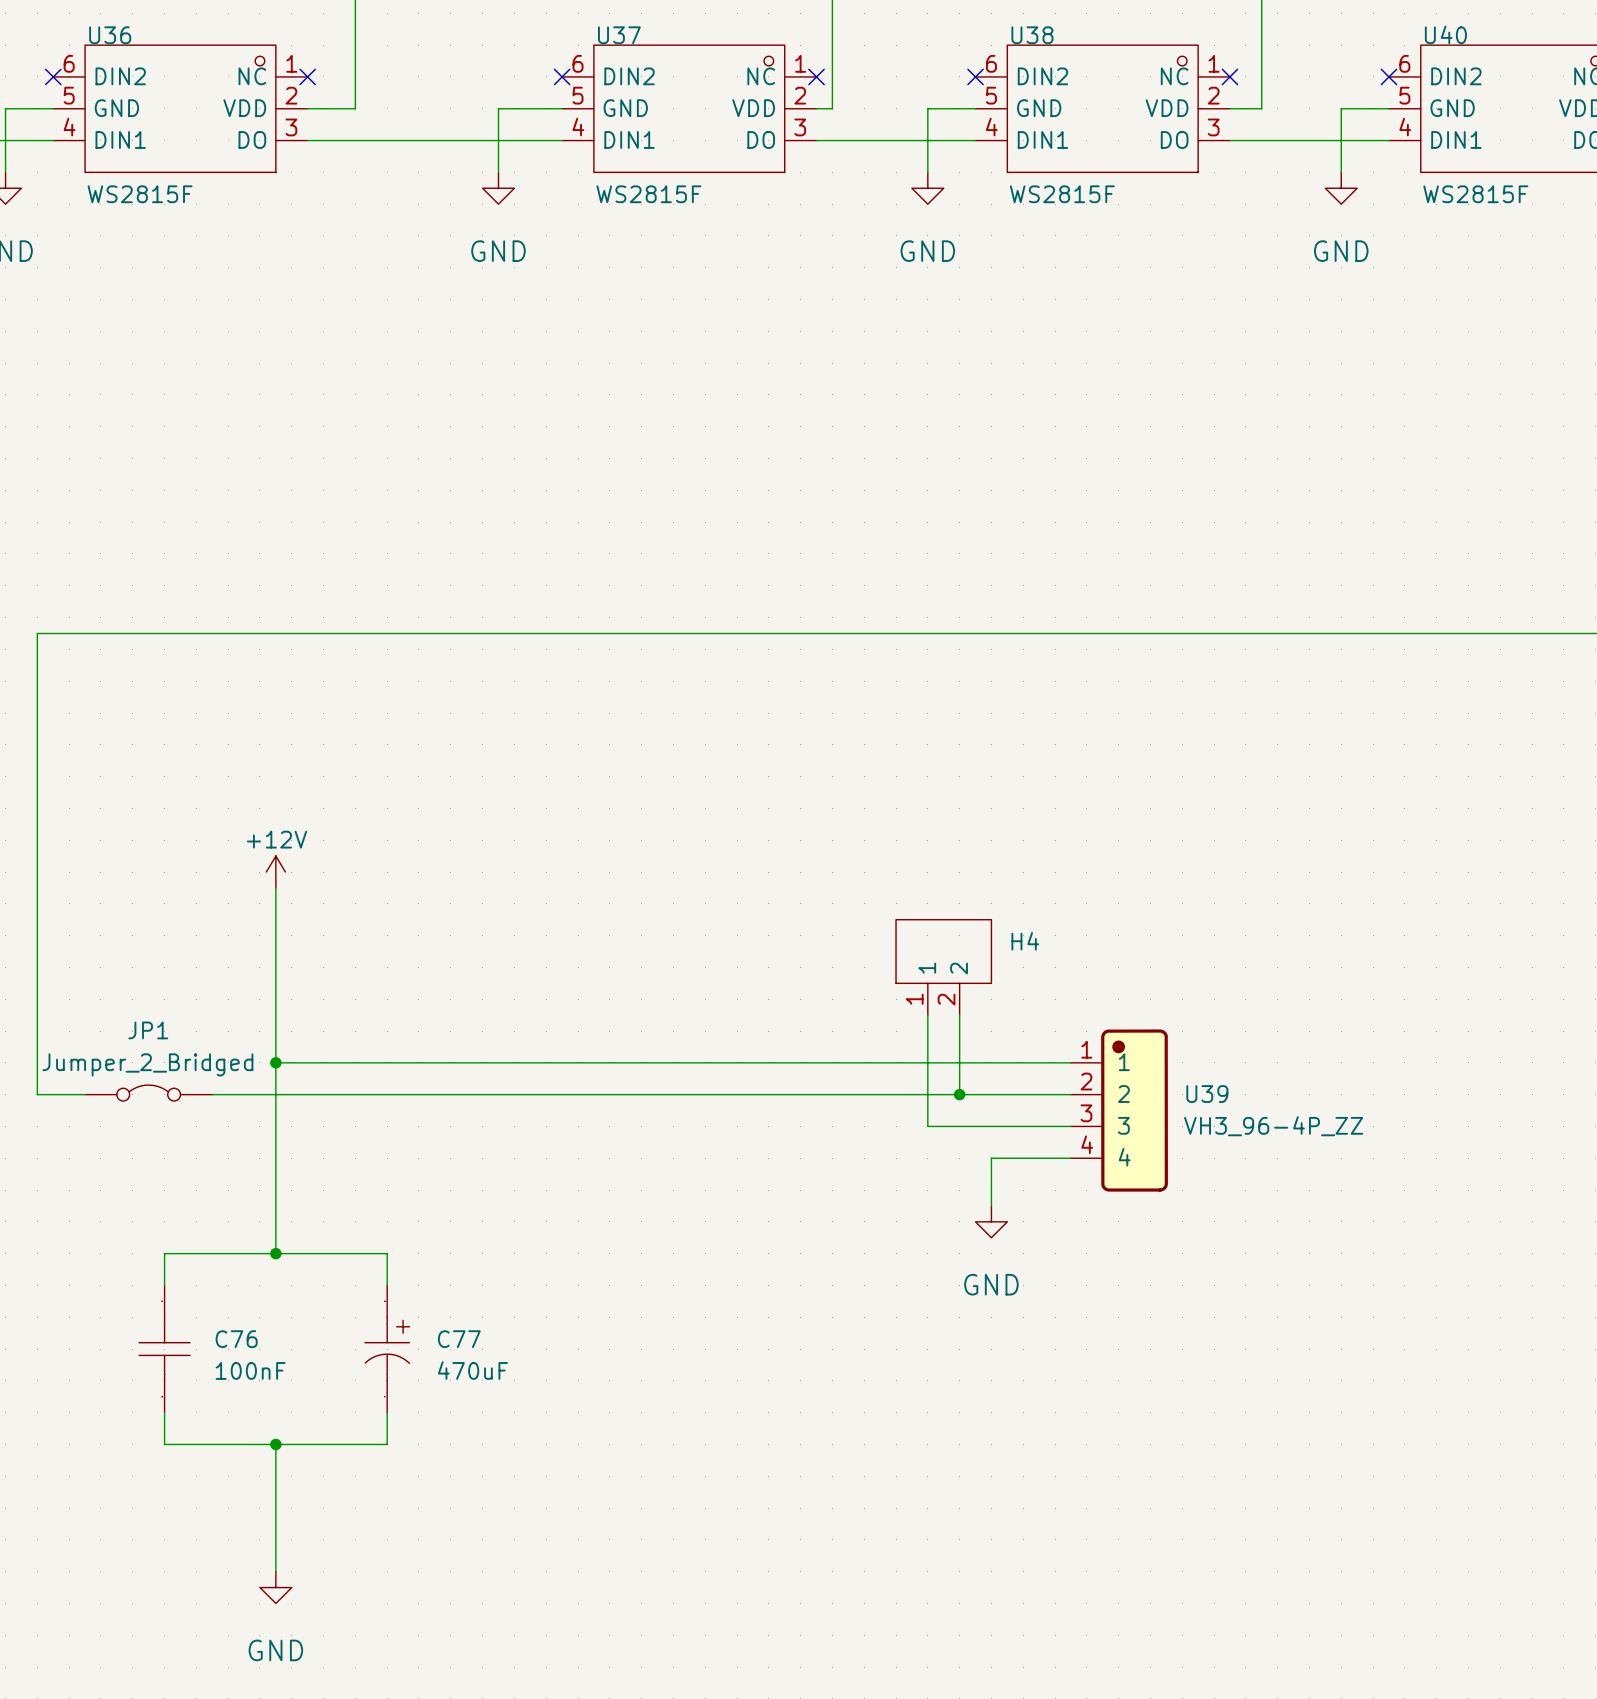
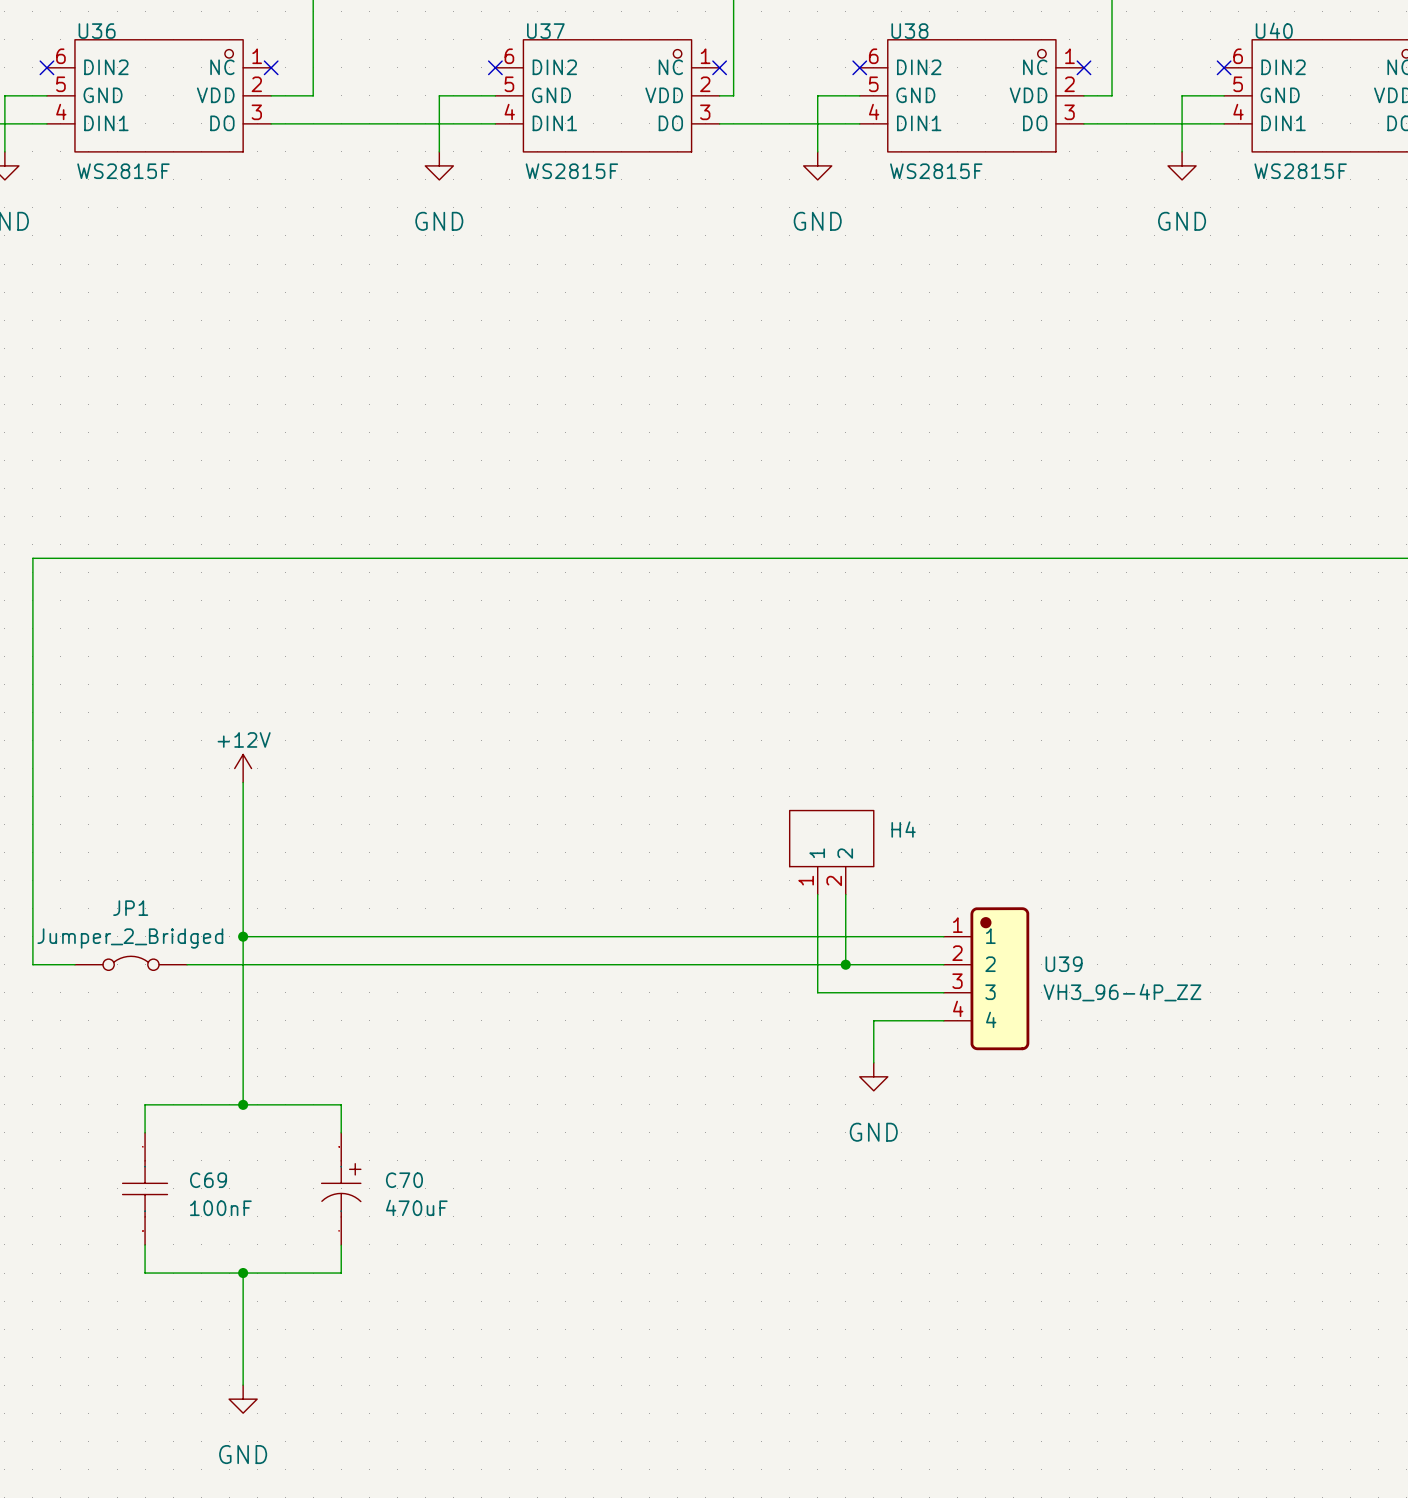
C76 name: C76 (236, 1339) -> C69 (208, 1180)
C77 name: C77 (459, 1339) -> C70 (404, 1180)

